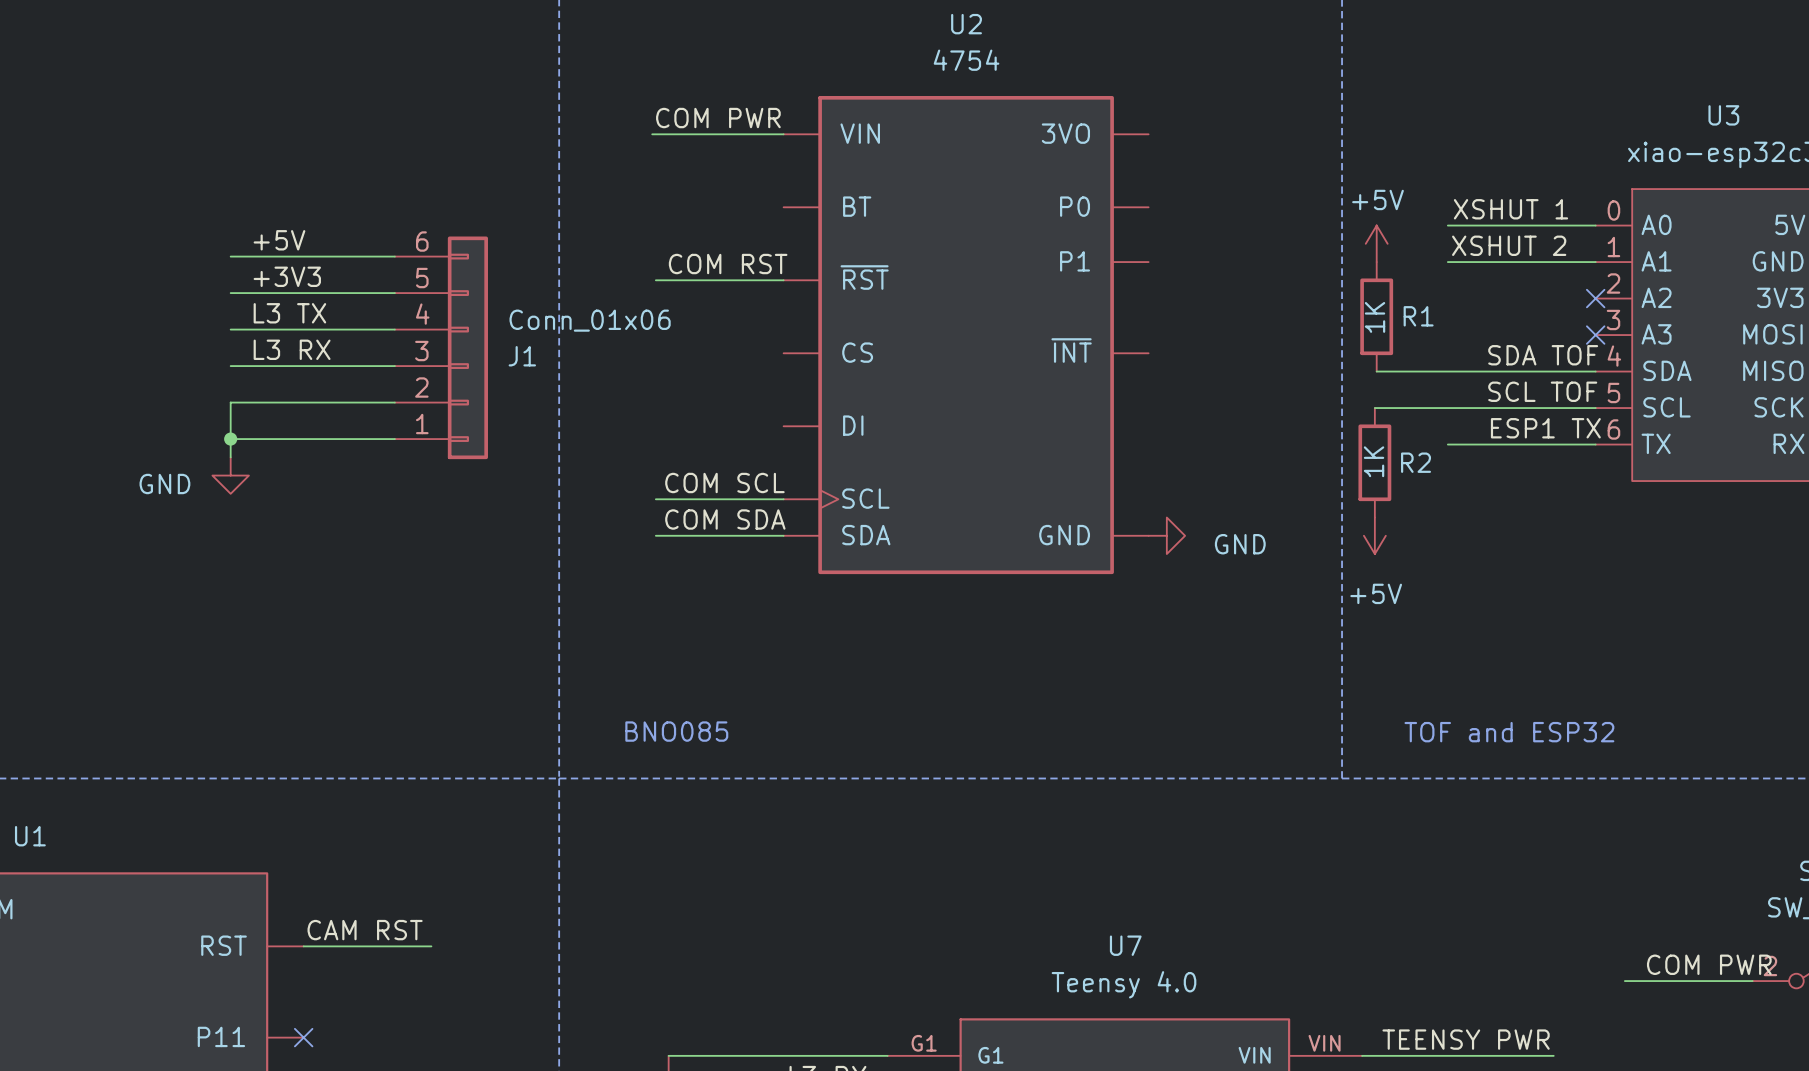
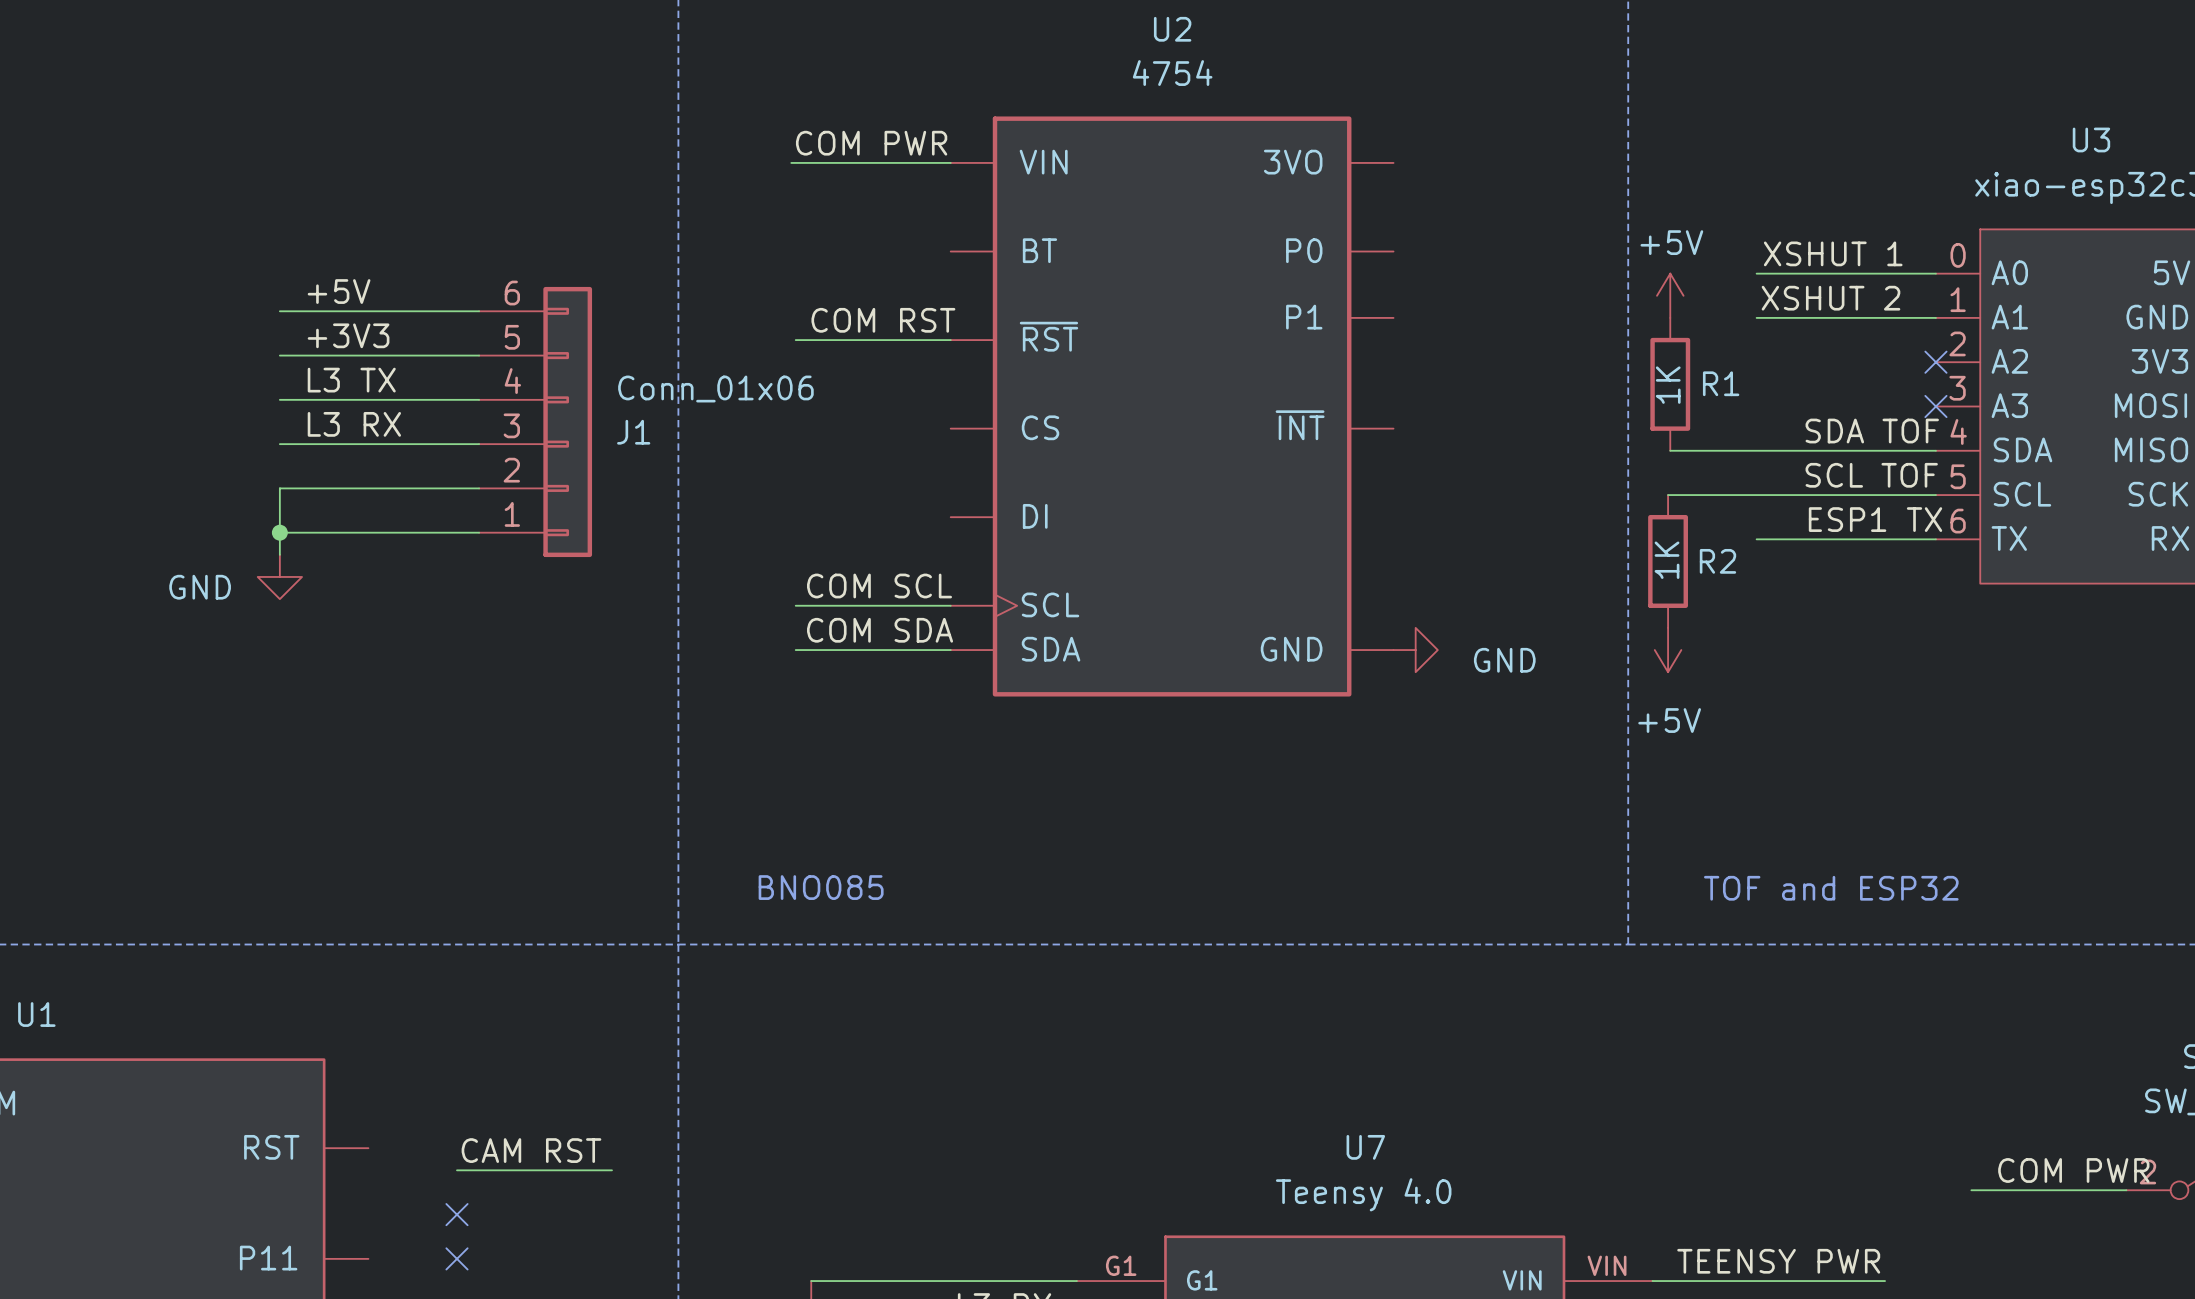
label position: CAM RST (365, 930) -> CAM RST (531, 1150)
wire: (303, 946) (431, 946) -> (456, 1170) (611, 1170)
no-connect mark: none -> (456, 1214)
no-connect mark: (303, 1037) -> none
no-connect mark: none -> (456, 1258)

